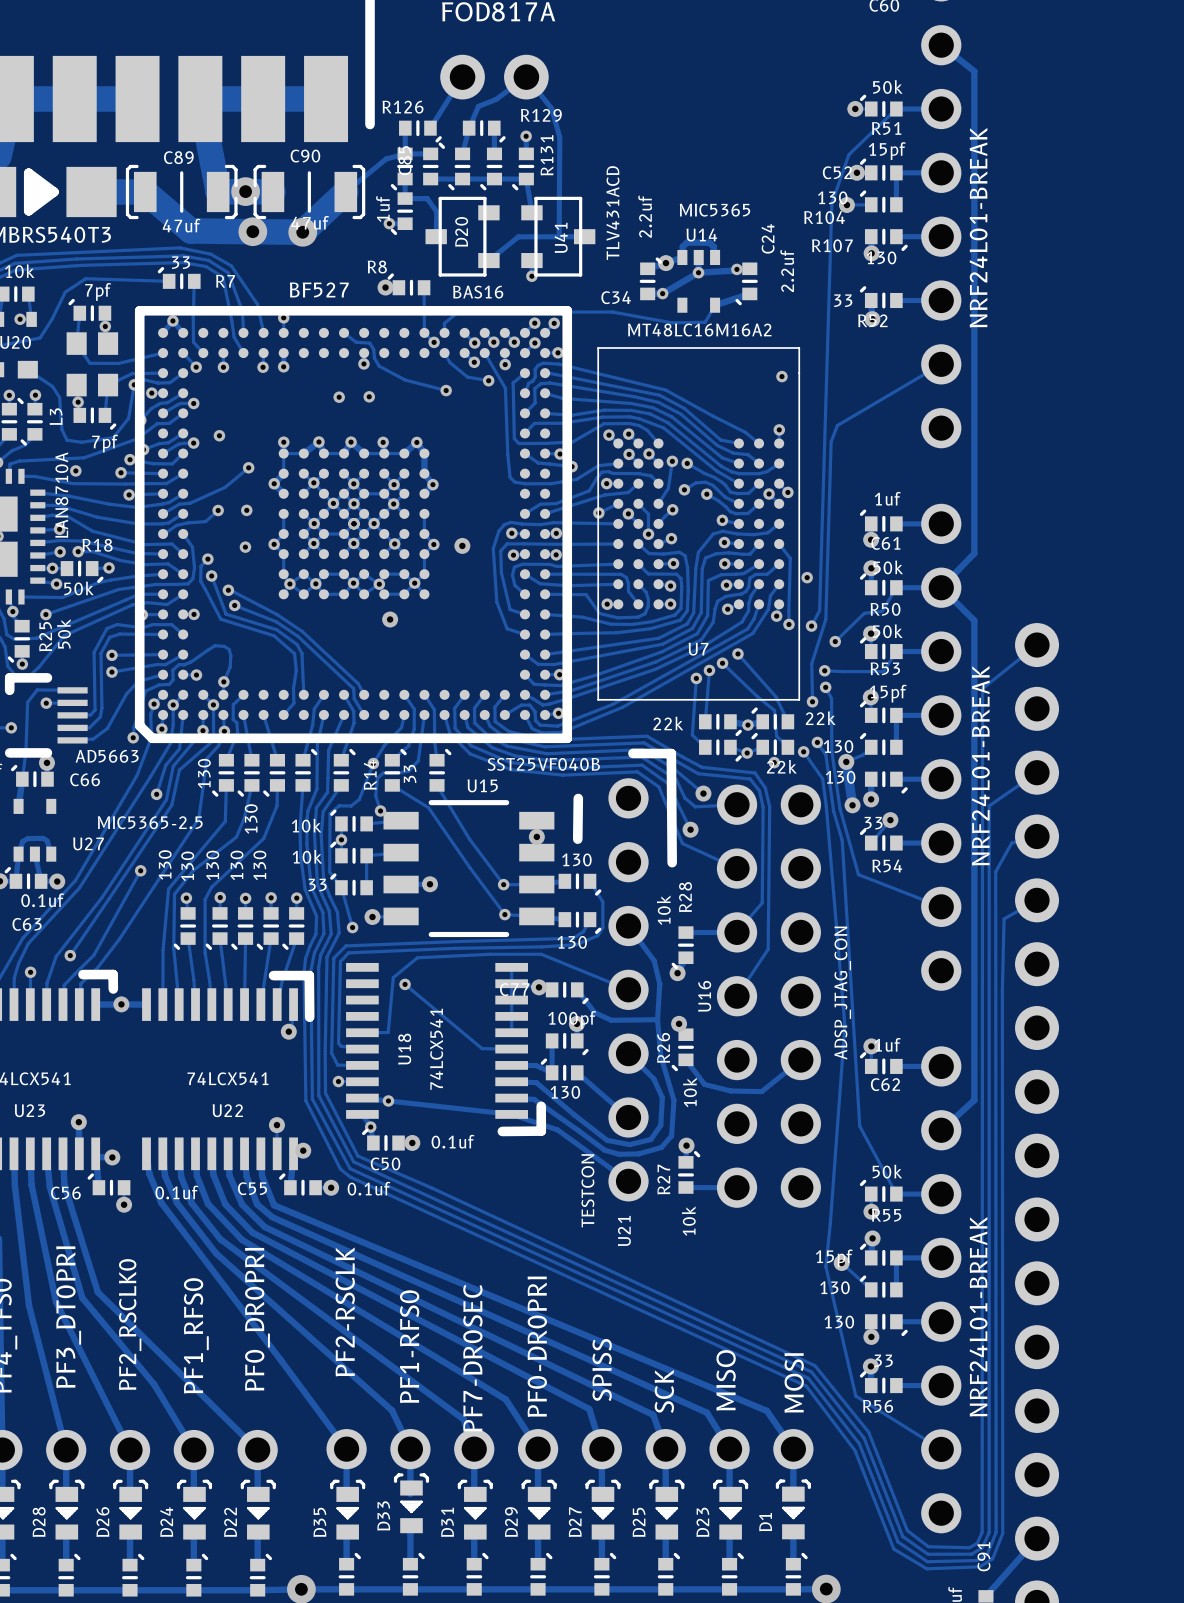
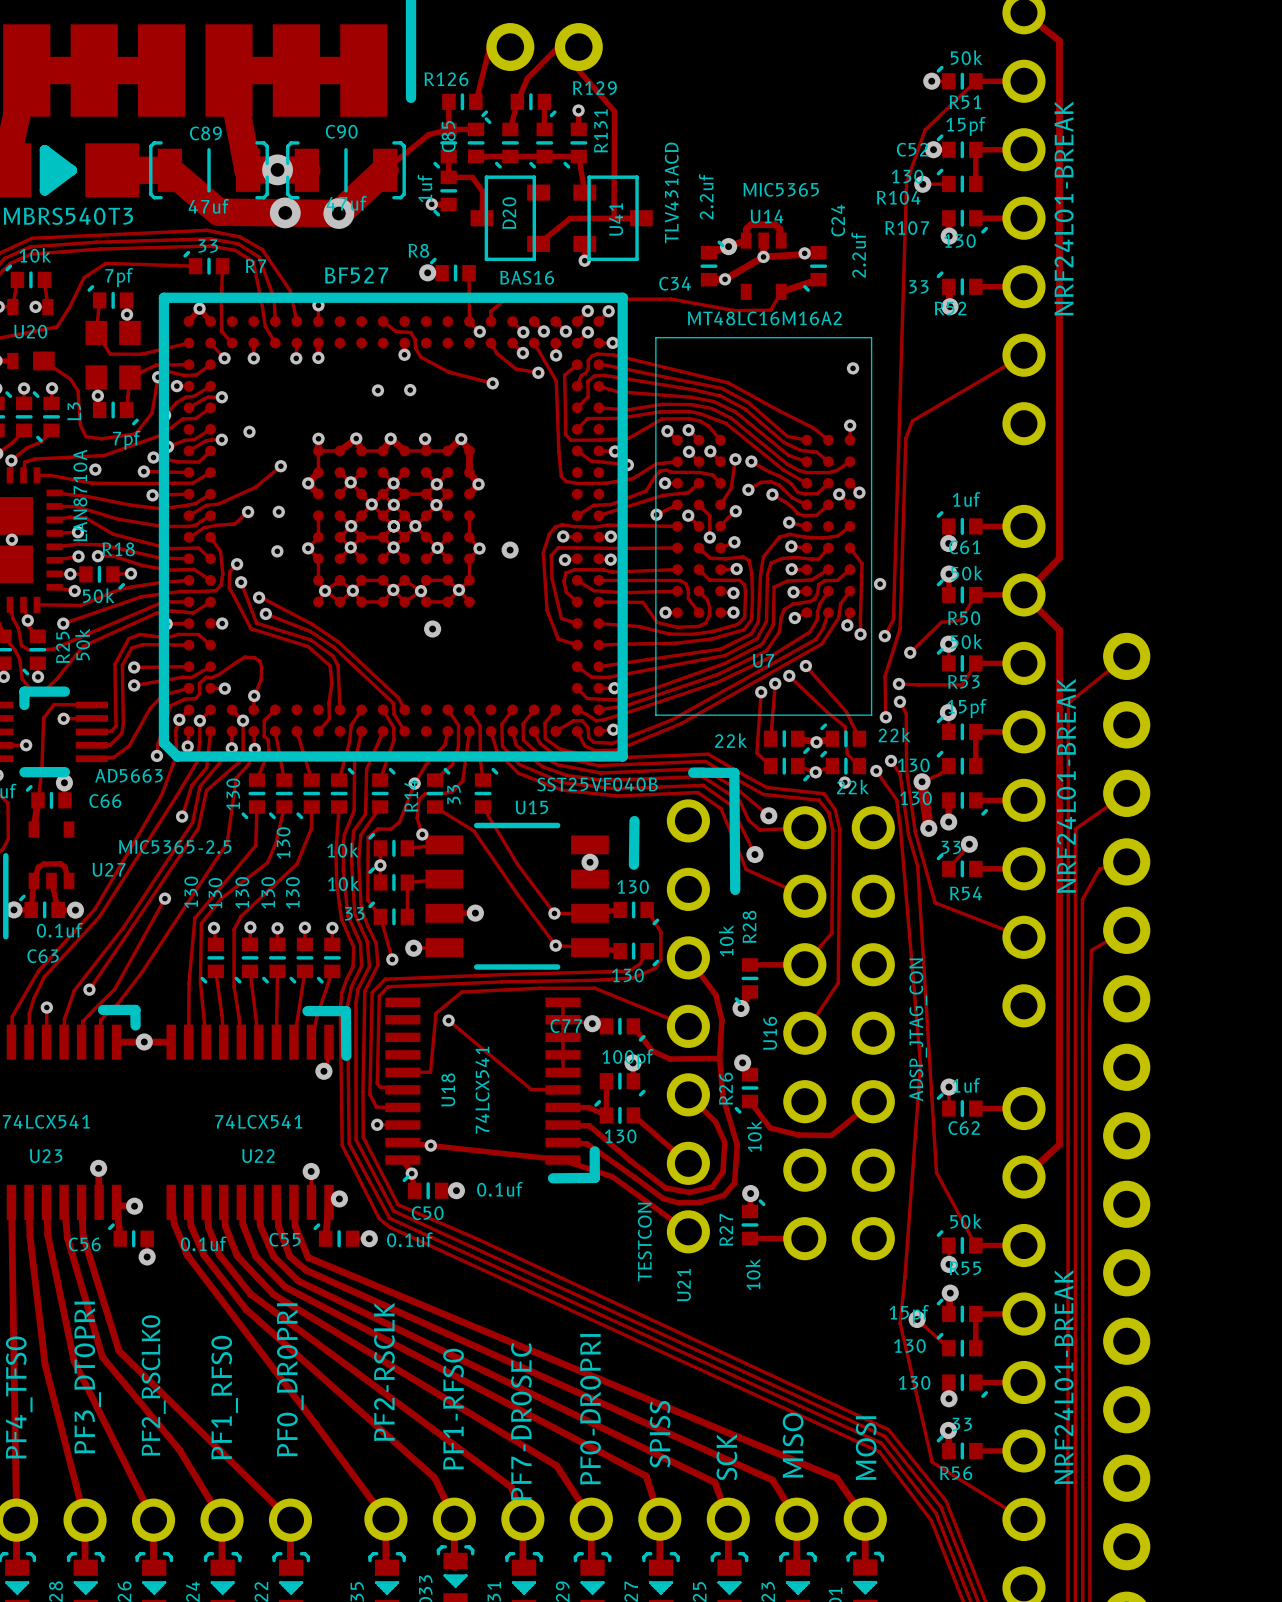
track: (462, 77) (430, 128) -> (489, 47) (475, 101)
track: (478, 106) (495, 99) (526, 77) (551, 108) (559, 137) -> (527, 78) (558, 47) (614, 111)

